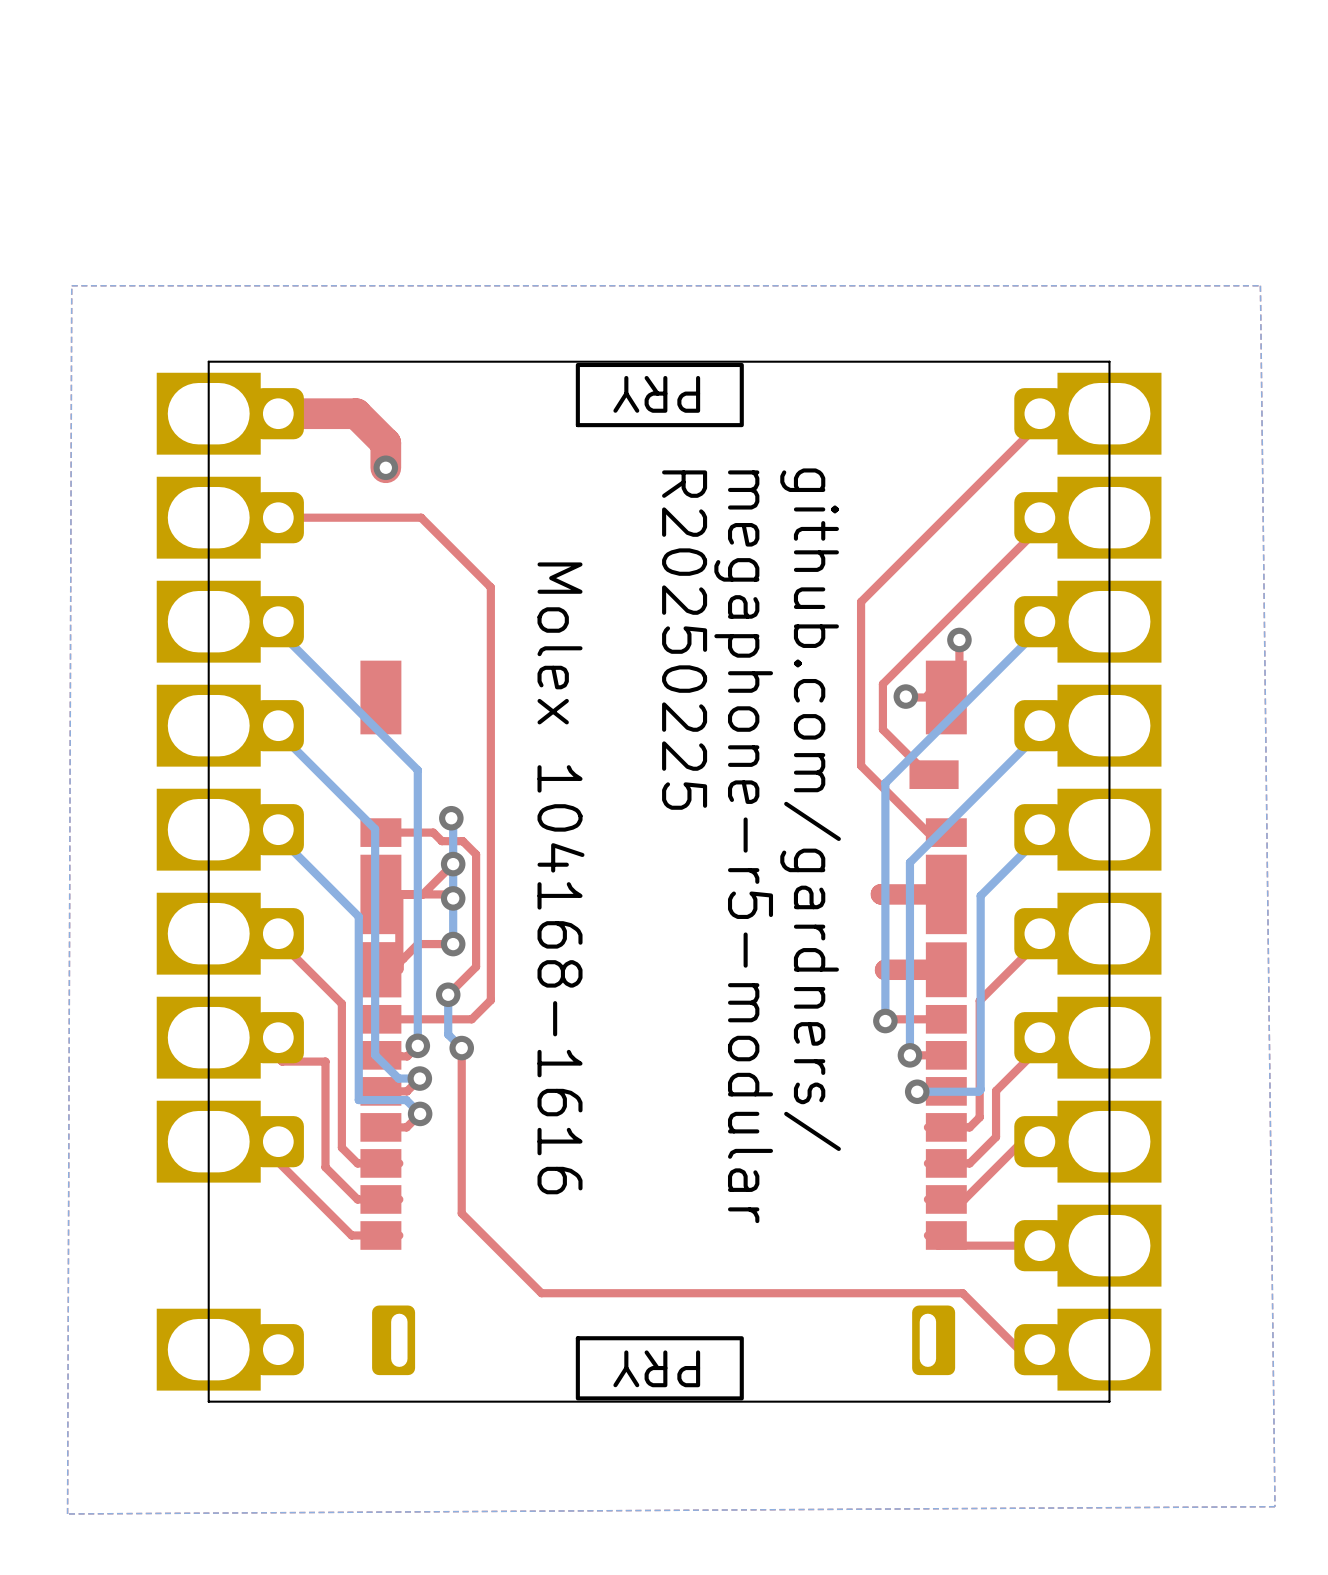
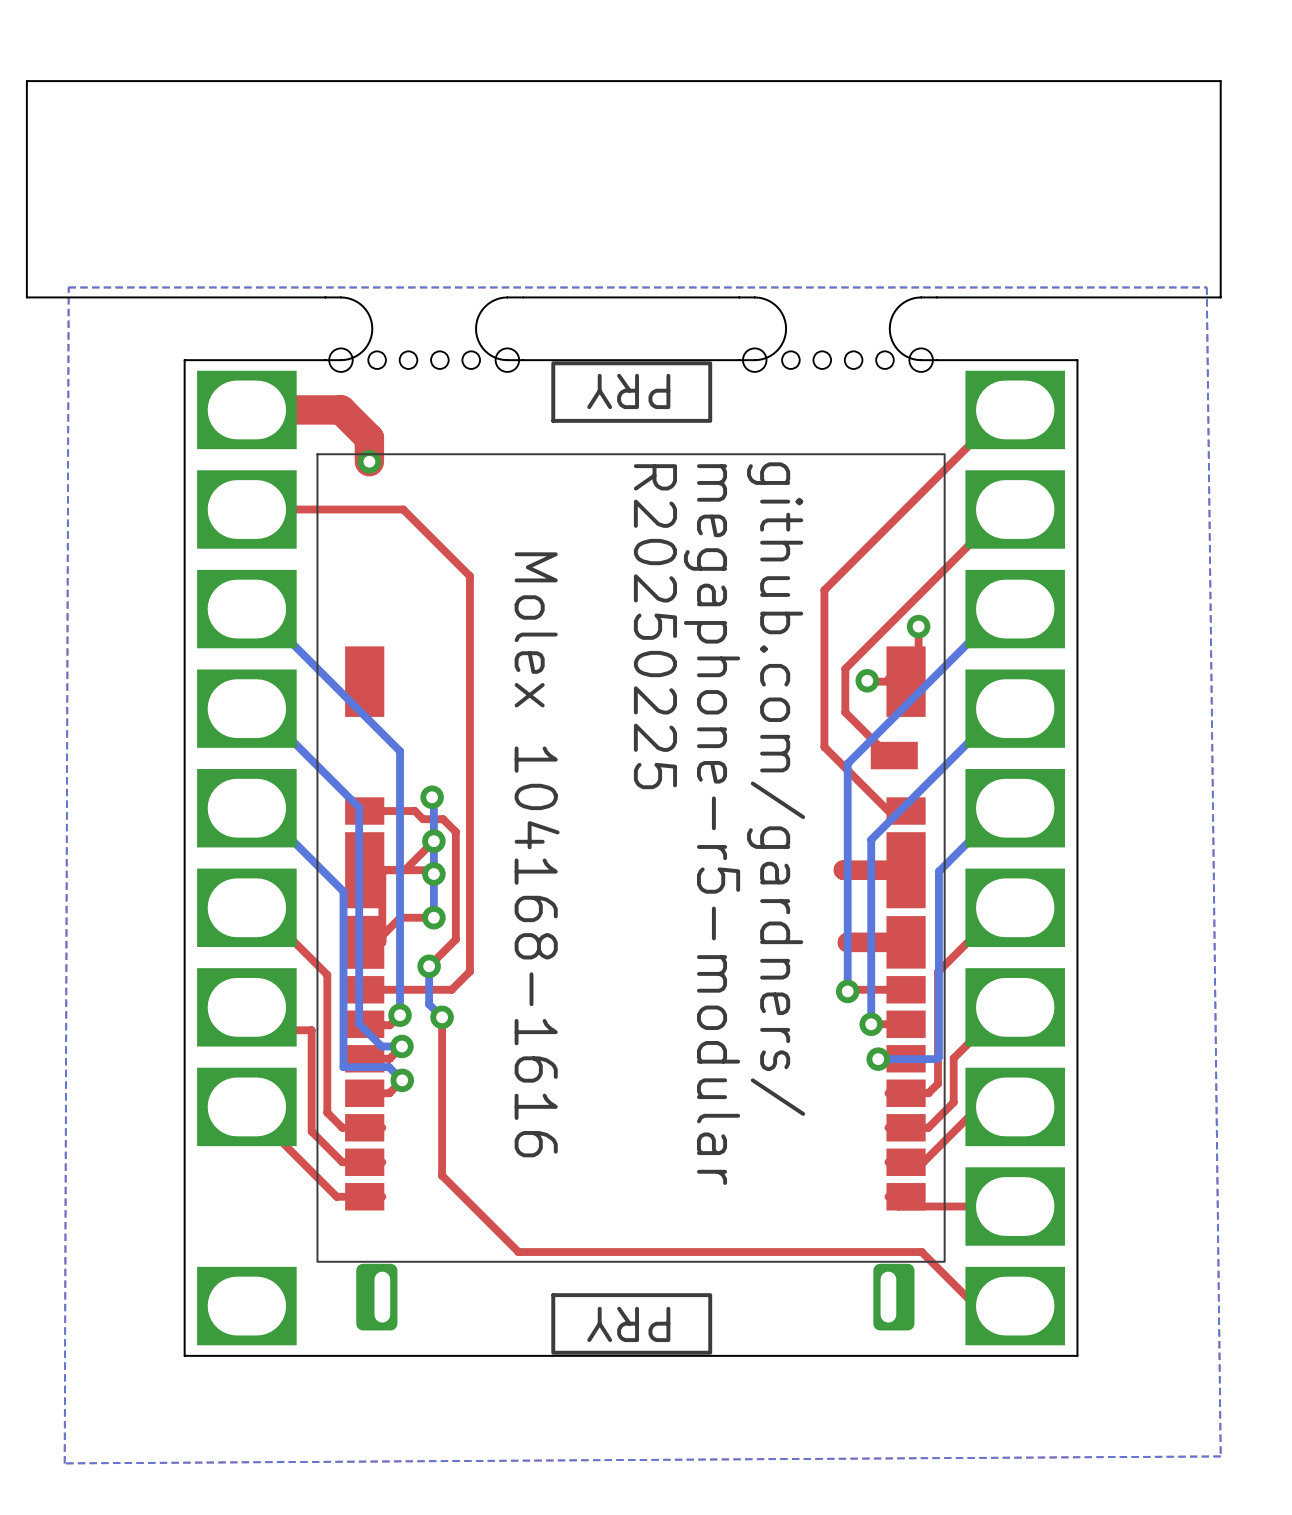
board edge: none -> (739, 297) (523, 297)
board edge: none -> (936, 297) (1220, 297) (1220, 81) (26, 81) (26, 297) (325, 297)
part footprint: [156, 360, 1162, 1403] -> [183, 296, 1079, 1357]

